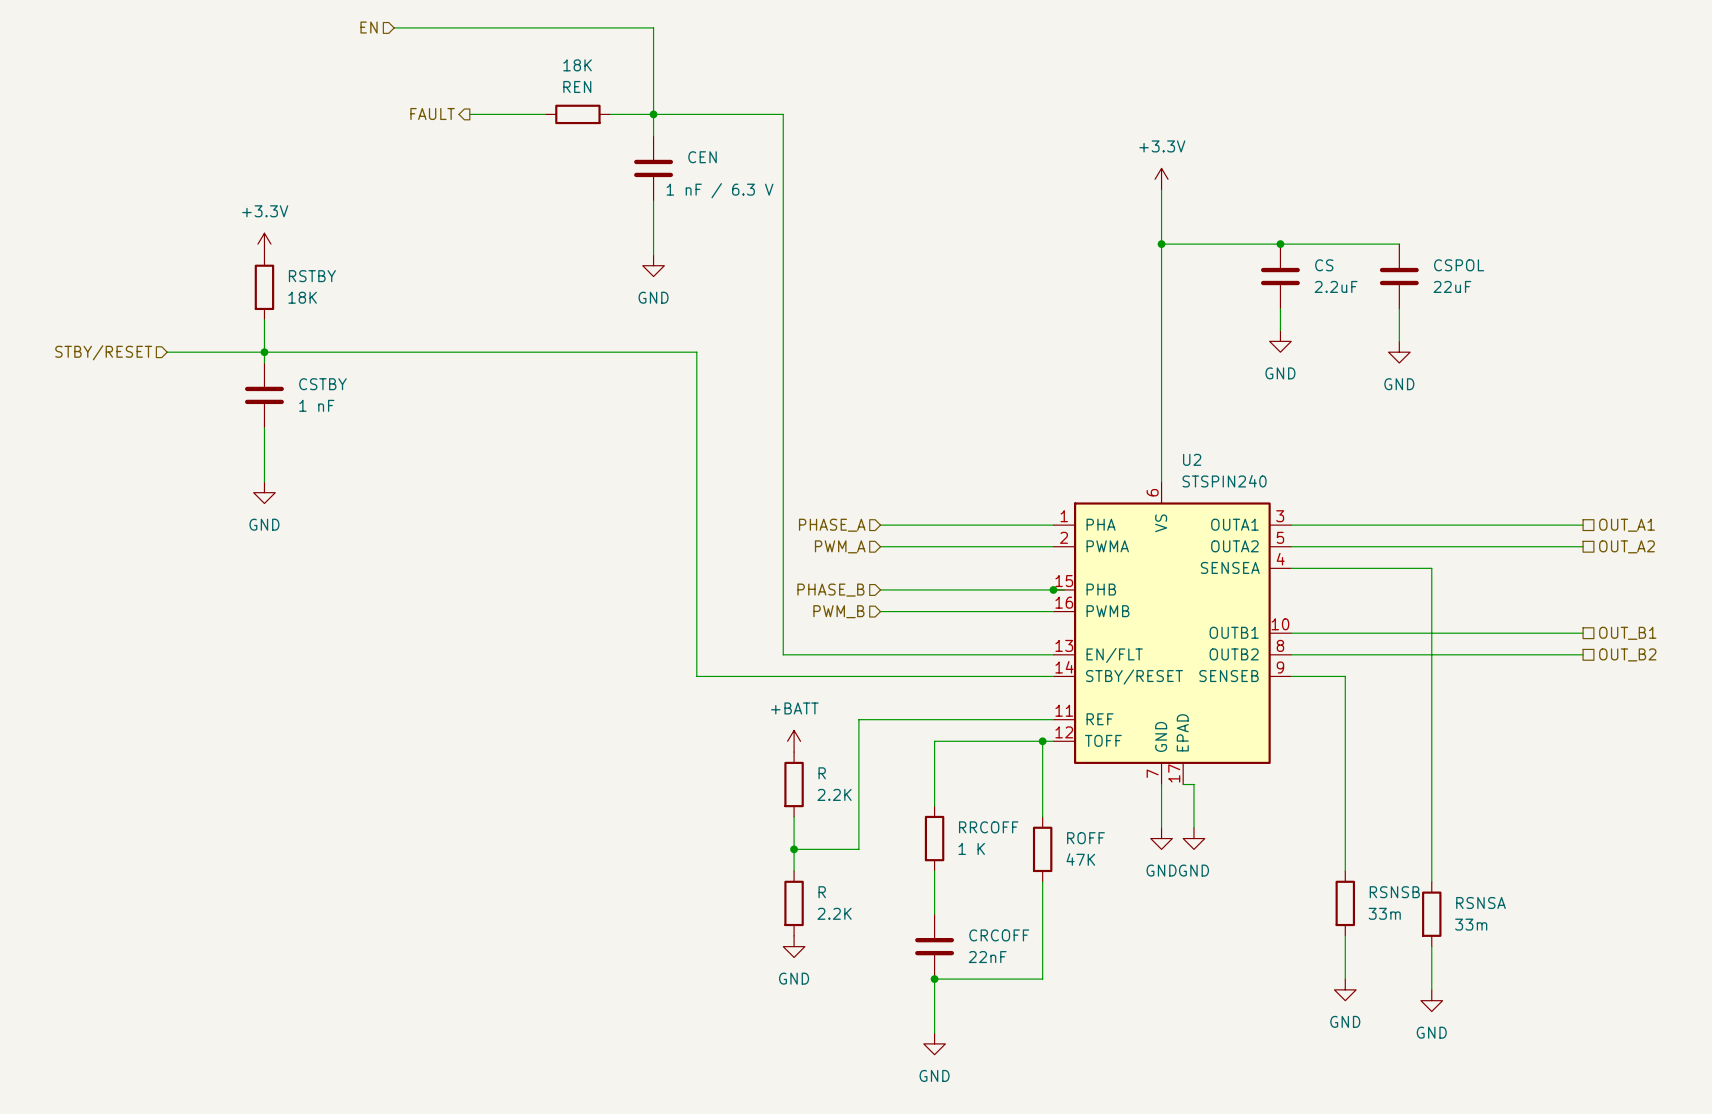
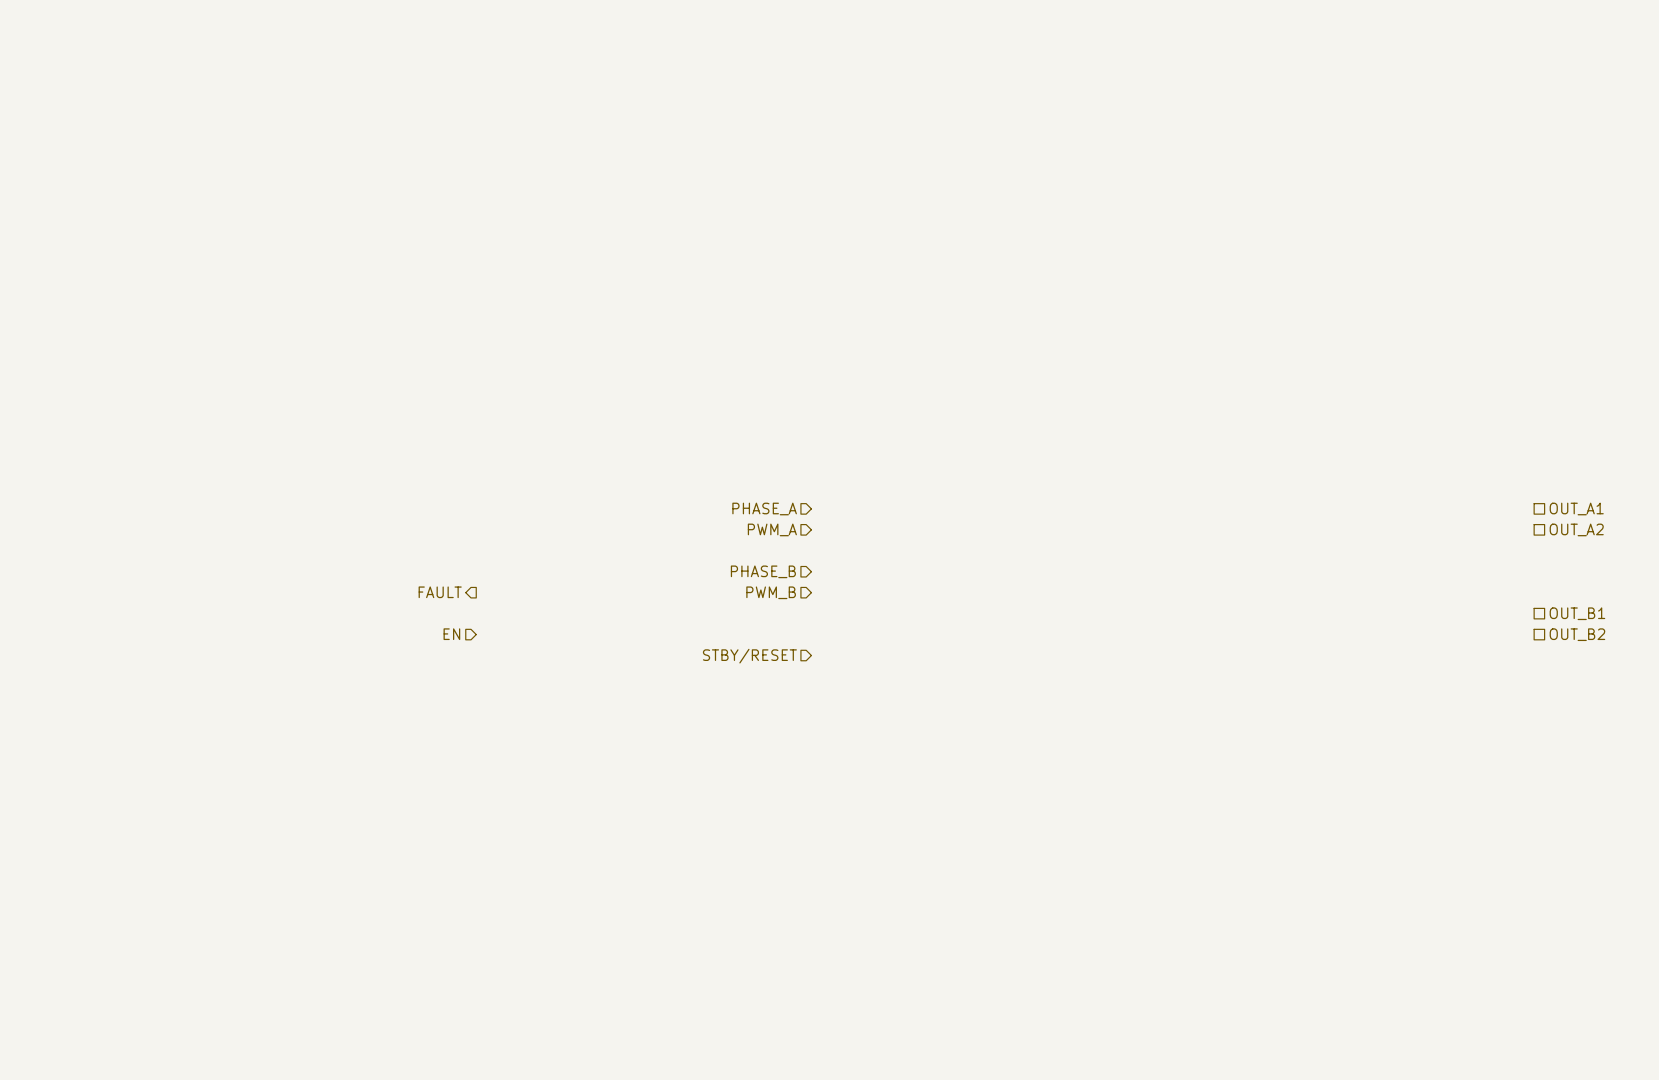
hierarchical label: EN (369, 27) -> none
wire: (394, 27) (653, 27) (653, 136) -> none
hierarchical label: FAULT (432, 114) -> none
wire: (469, 114) (545, 114) -> none
REN: 18K (577, 114) -> none
wire: (610, 114) (783, 114) (783, 654) (1053, 654) -> none
junction: (653, 114) -> none
CEN: 1 nF / 6.3 V (653, 168) -> none
power symbol: +3.3V (1161, 179) -> none
wire: (1161, 190) (1161, 481) -> none
wire: (653, 200) (653, 254) -> none
power symbol: +3.3V (264, 244) -> none
wire: (1161, 244) (1399, 244) -> none
junction: (1161, 244) -> none
junction: (1280, 244) -> none
power symbol: GND (653, 265) -> none
CS: 2.2uF (1280, 276) -> none
CSPOL: 22uF (1399, 276) -> none
RSTBY: 18K (264, 287) -> none
wire: (1280, 308) (1280, 330) -> none
wire: (1399, 308) (1399, 341) -> none
wire: (264, 319) (264, 362) -> none
power symbol: GND (1280, 341) -> none
hierarchical label: STBY/RESET (103, 352) -> none
wire: (167, 352) (696, 352) (696, 676) (1053, 676) -> none
junction: (264, 352) -> none
power symbol: GND (1399, 352) -> none
CSTBY: 1 nF (264, 395) -> none
wire: (264, 427) (264, 481) -> none
power symbol: GND (264, 492) -> none
hierarchical label position: PHASE_A (832, 525) -> PHASE_A (764, 508)
wire: (880, 525) (1053, 525) -> none
wire: (1291, 525) (1583, 525) -> none
hierarchical label position: PWM_A (840, 546) -> PWM_A (772, 529)
wire: (880, 546) (1053, 546) -> none
wire: (1291, 546) (1583, 546) -> none
wire: (1291, 568) (1431, 568) (1431, 881) -> none
wire: (880, 589) (1064, 589) -> none
junction: (1053, 589) -> none
hierarchical label position: PHASE_B (830, 590) -> PHASE_B (763, 571)
hierarchical label: none -> FAULT (440, 592)
hierarchical label position: PWM_B (838, 611) -> PWM_B (771, 592)
wire: (880, 611) (1053, 611) -> none
U2: STSPIN240 (1172, 633) -> none
wire: (1291, 633) (1583, 633) -> none
hierarchical label: none -> EN (451, 634)
wire: (1291, 654) (1583, 654) -> none
wire: (1291, 676) (1345, 676) (1345, 870) -> none
hierarchical label: none -> STBY/RESET (749, 656)
wire: (1053, 719) (858, 719) (858, 849) (794, 849) -> none
power symbol: +BATT (794, 741) -> none
wire: (1042, 741) (1042, 816) -> none
junction: (1042, 741) -> none
wire: (1053, 741) (934, 741) (934, 806) -> none
R: 2.2K (794, 784) -> none
wire: (1161, 784) (1161, 827) -> none
wire: (1183, 784) (1193, 784) (1193, 827) -> none
wire: (794, 816) (794, 870) -> none
RRCOFF: 1 K (934, 838) -> none
power symbol: GND (1161, 838) -> none
power symbol: GND (1193, 838) -> none
junction: (794, 849) -> none
ROFF: 47K (1042, 849) -> none
wire: (934, 870) (934, 914) -> none
wire: (1042, 881) (1042, 979) (934, 979) (934, 1033) -> none
R: 2.2K (794, 903) -> none
RSNSB: 33m (1345, 903) -> none
RSNSA: 33m (1431, 914) -> none
wire: (1345, 935) (1345, 979) -> none
power symbol: GND (794, 946) -> none
CRCOFF: 22nF (934, 946) -> none
wire: (1431, 946) (1431, 989) -> none
junction: (934, 979) -> none
power symbol: GND (1345, 989) -> none
power symbol: GND (1431, 1000) -> none
power symbol: GND (934, 1043) -> none

